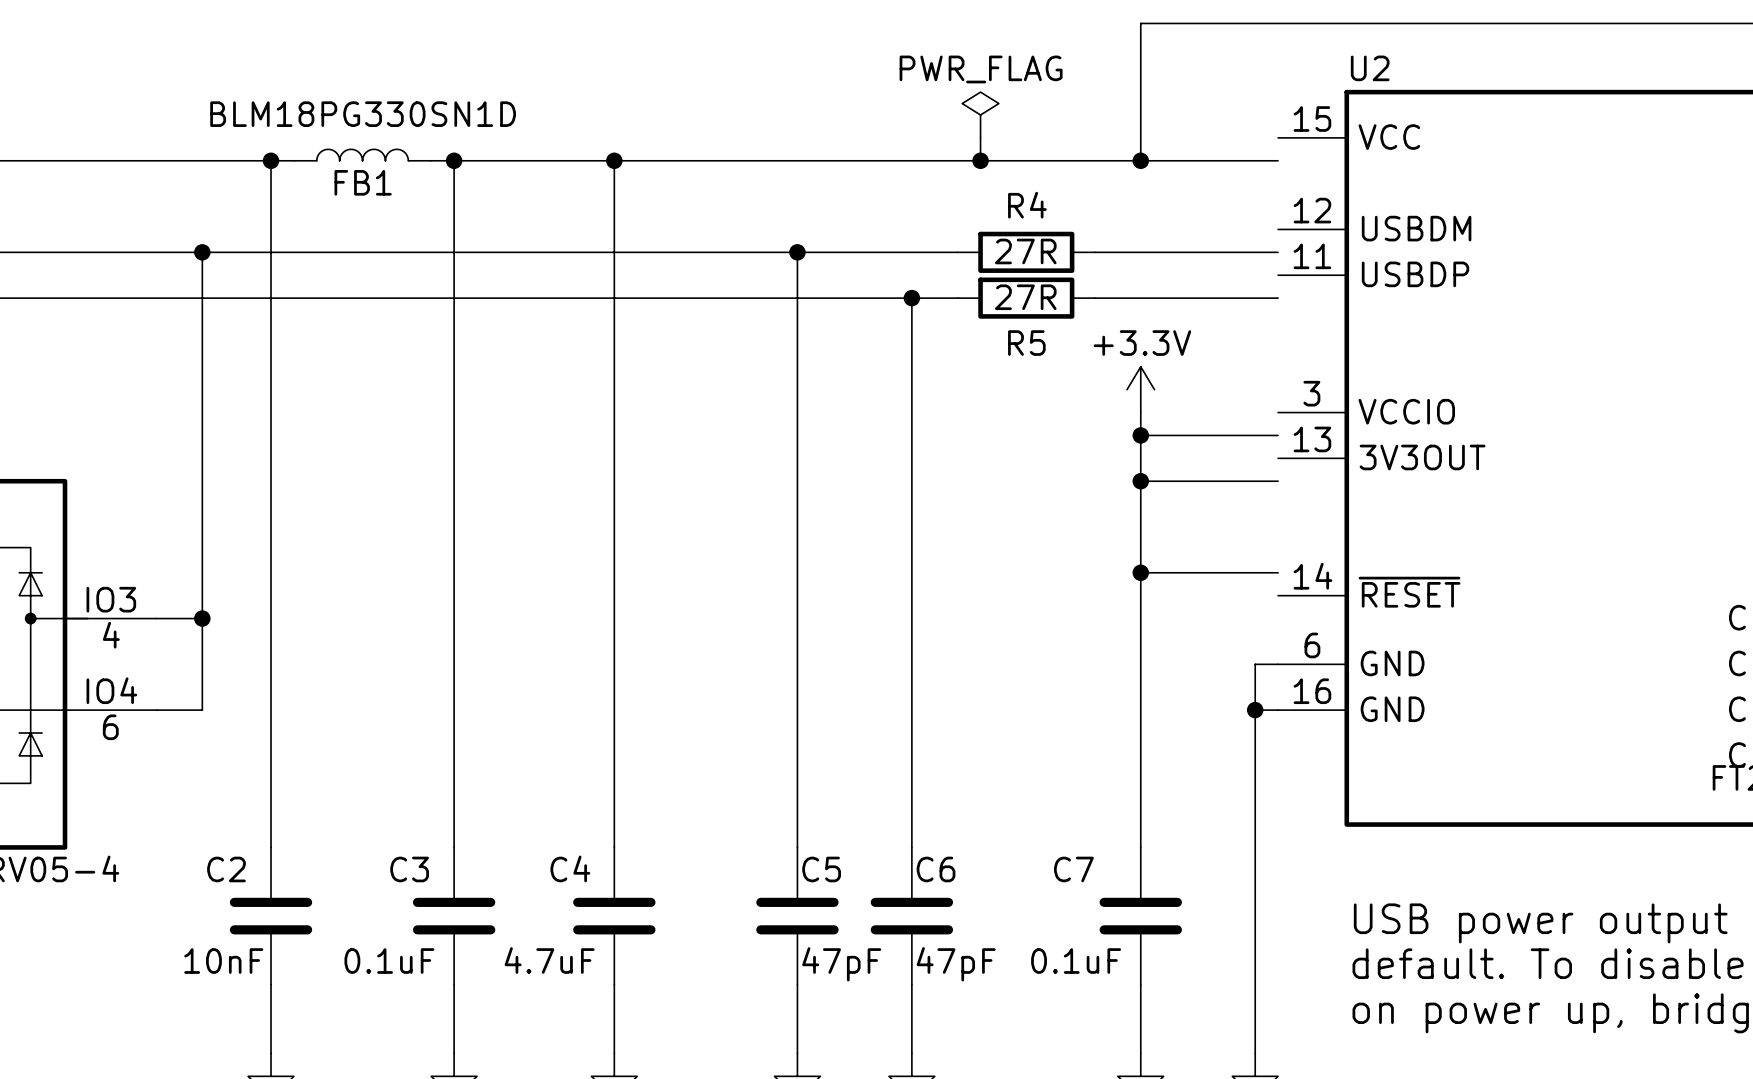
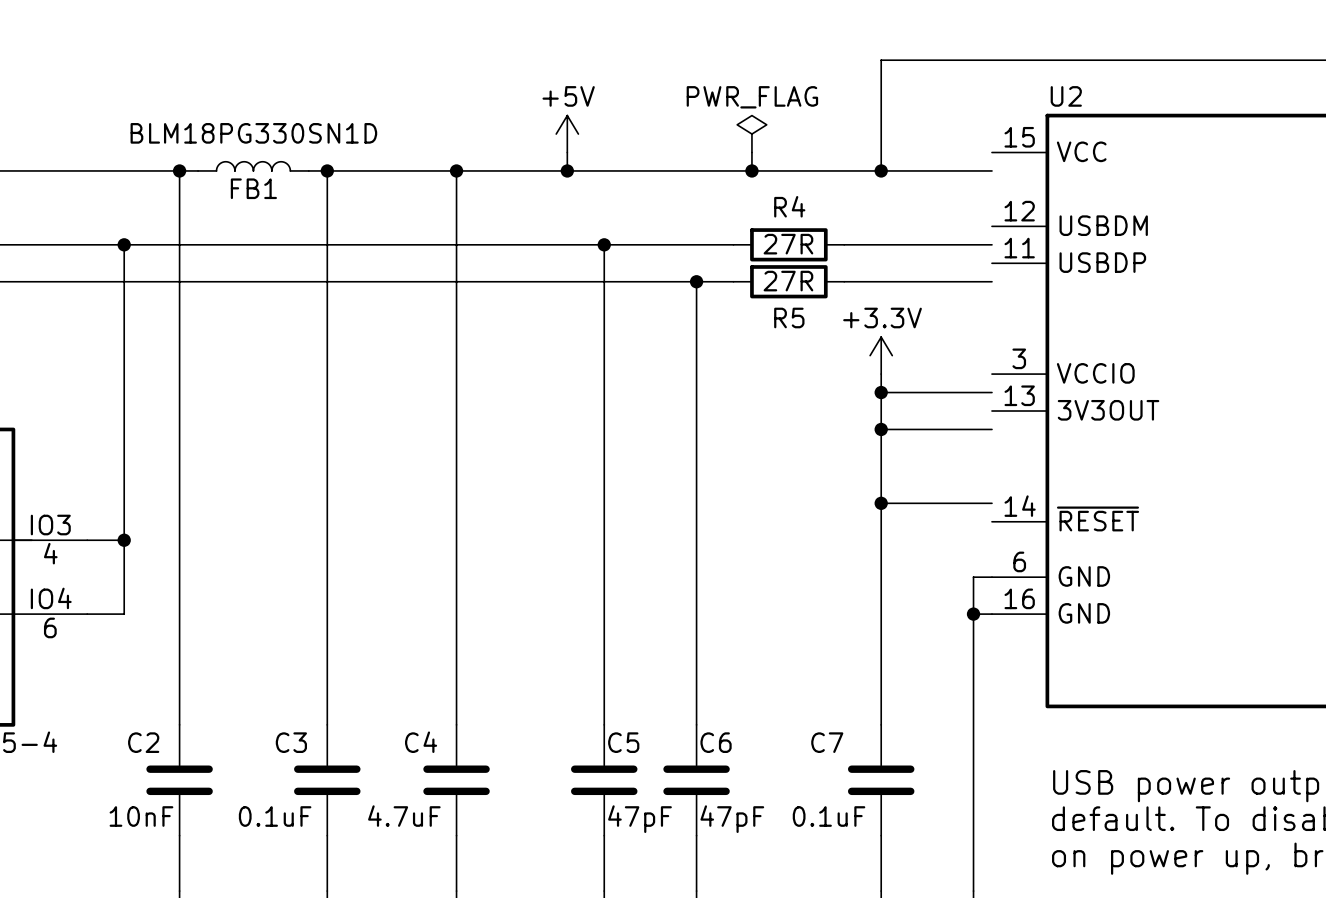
power symbol: none -> +5V (567, 134)
wire: none -> (567, 152) (567, 170)
junction: none -> (567, 170)

